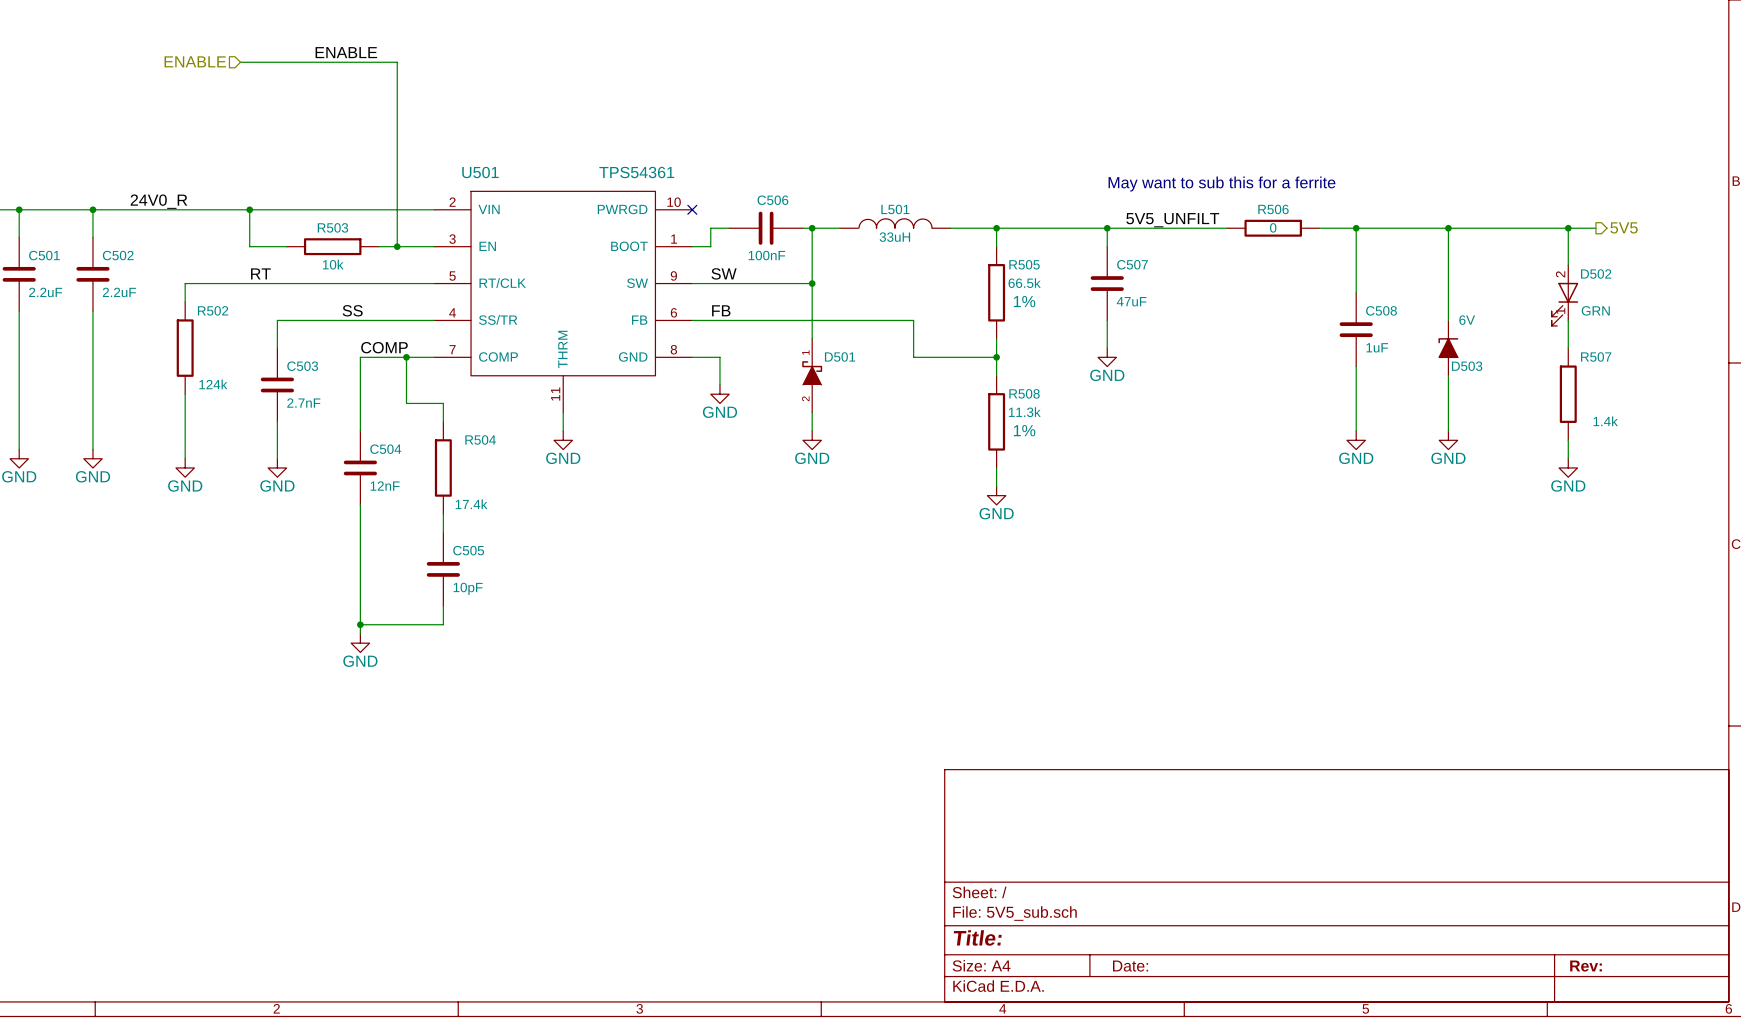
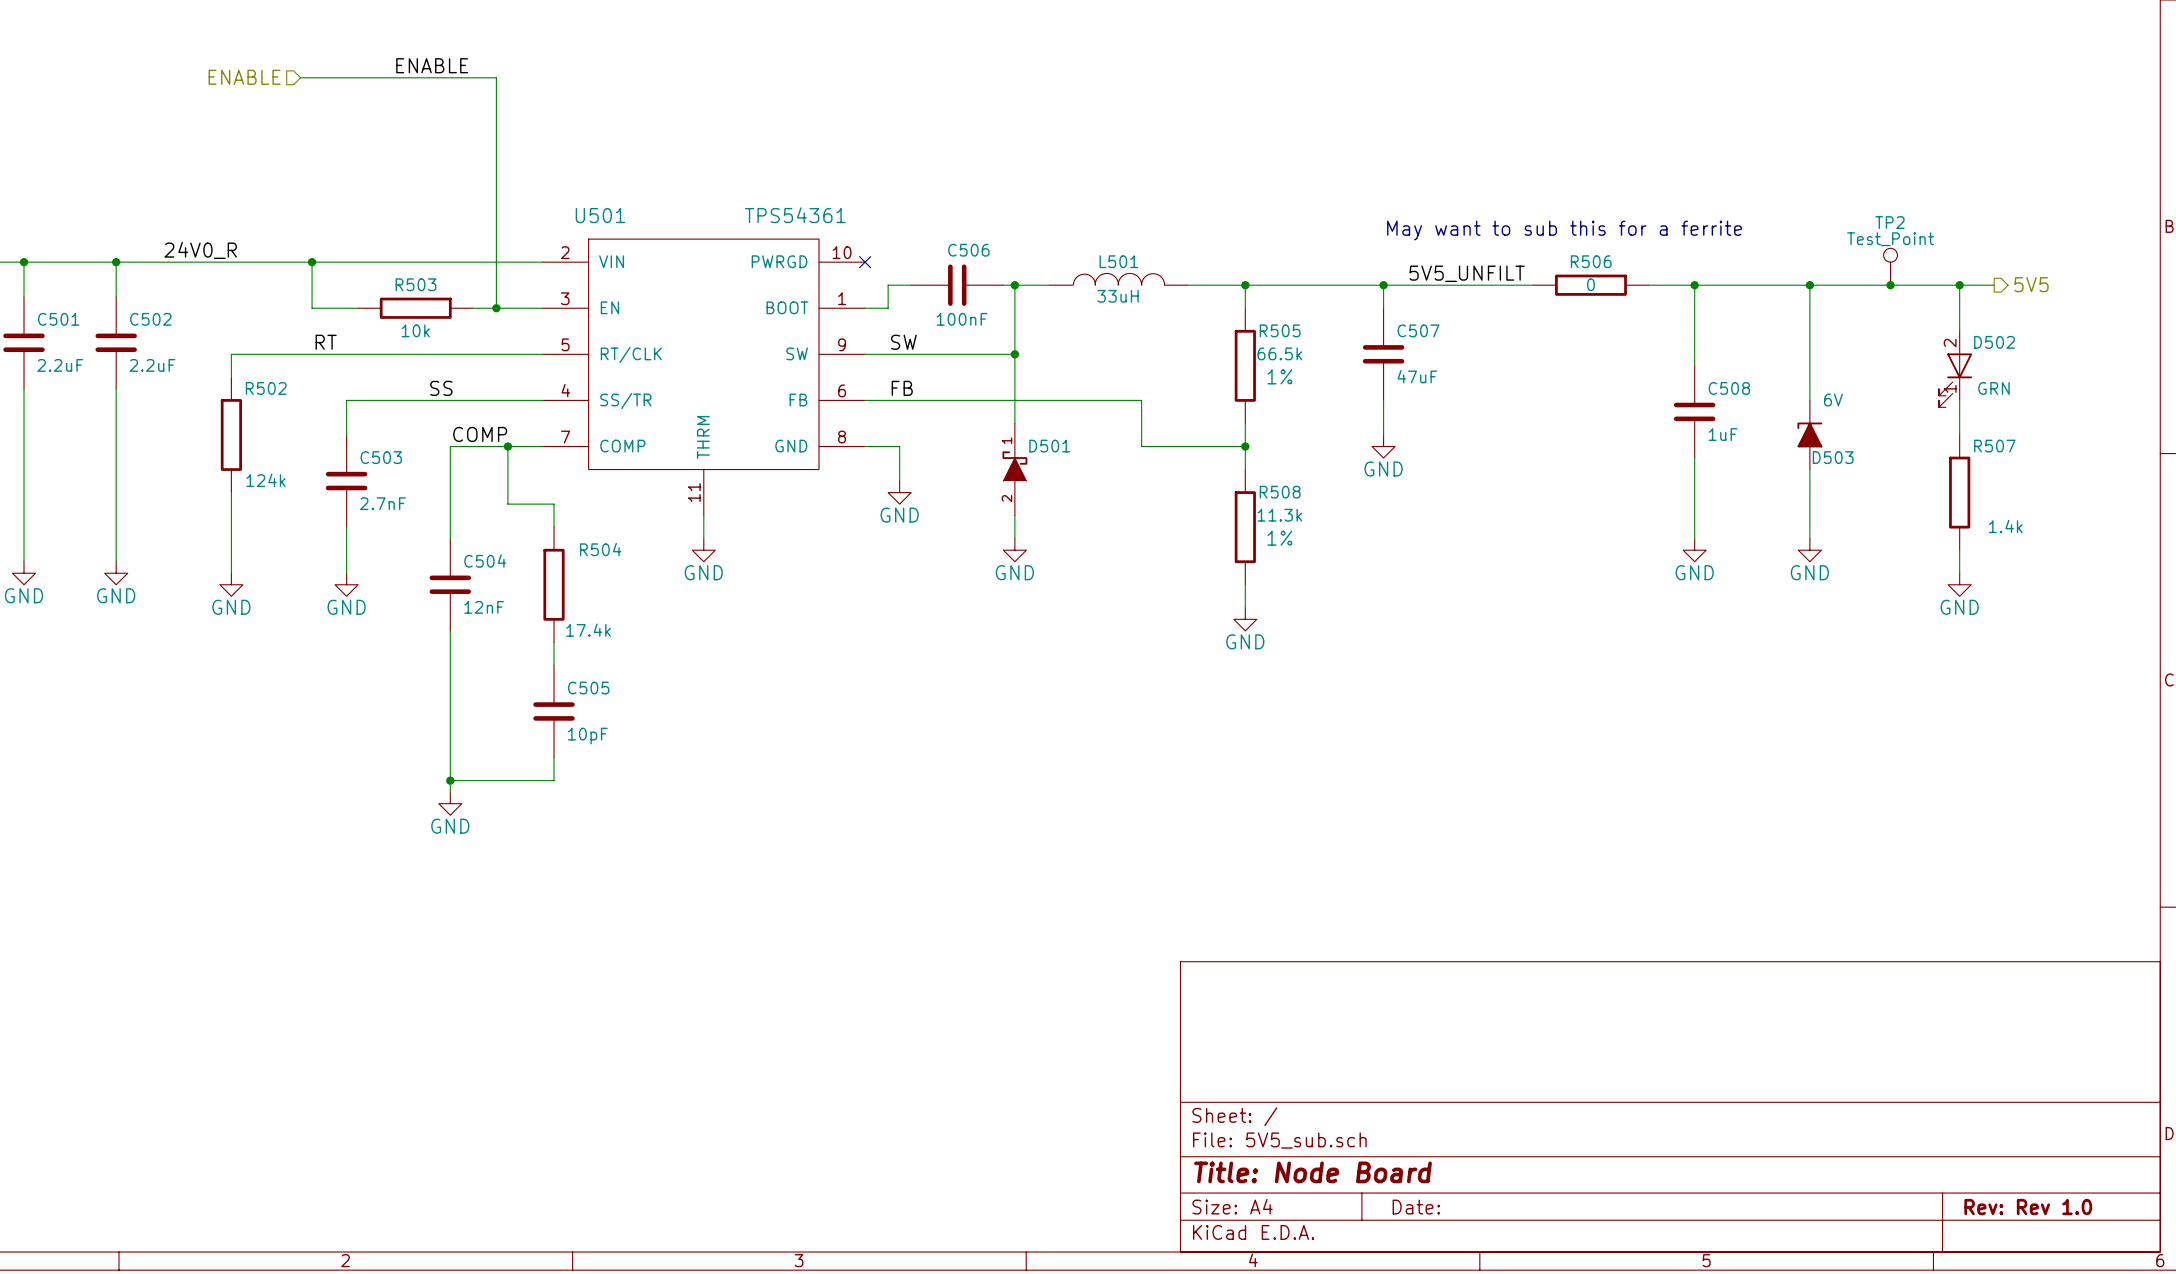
TP2: none -> Test_Point (1890, 266)
junction: none -> (1890, 285)
title block: Title: (977, 937) -> Title: Node Board (1313, 1172)
title block: Rev: (1586, 966) -> Rev: Rev 1.0 (2028, 1207)

